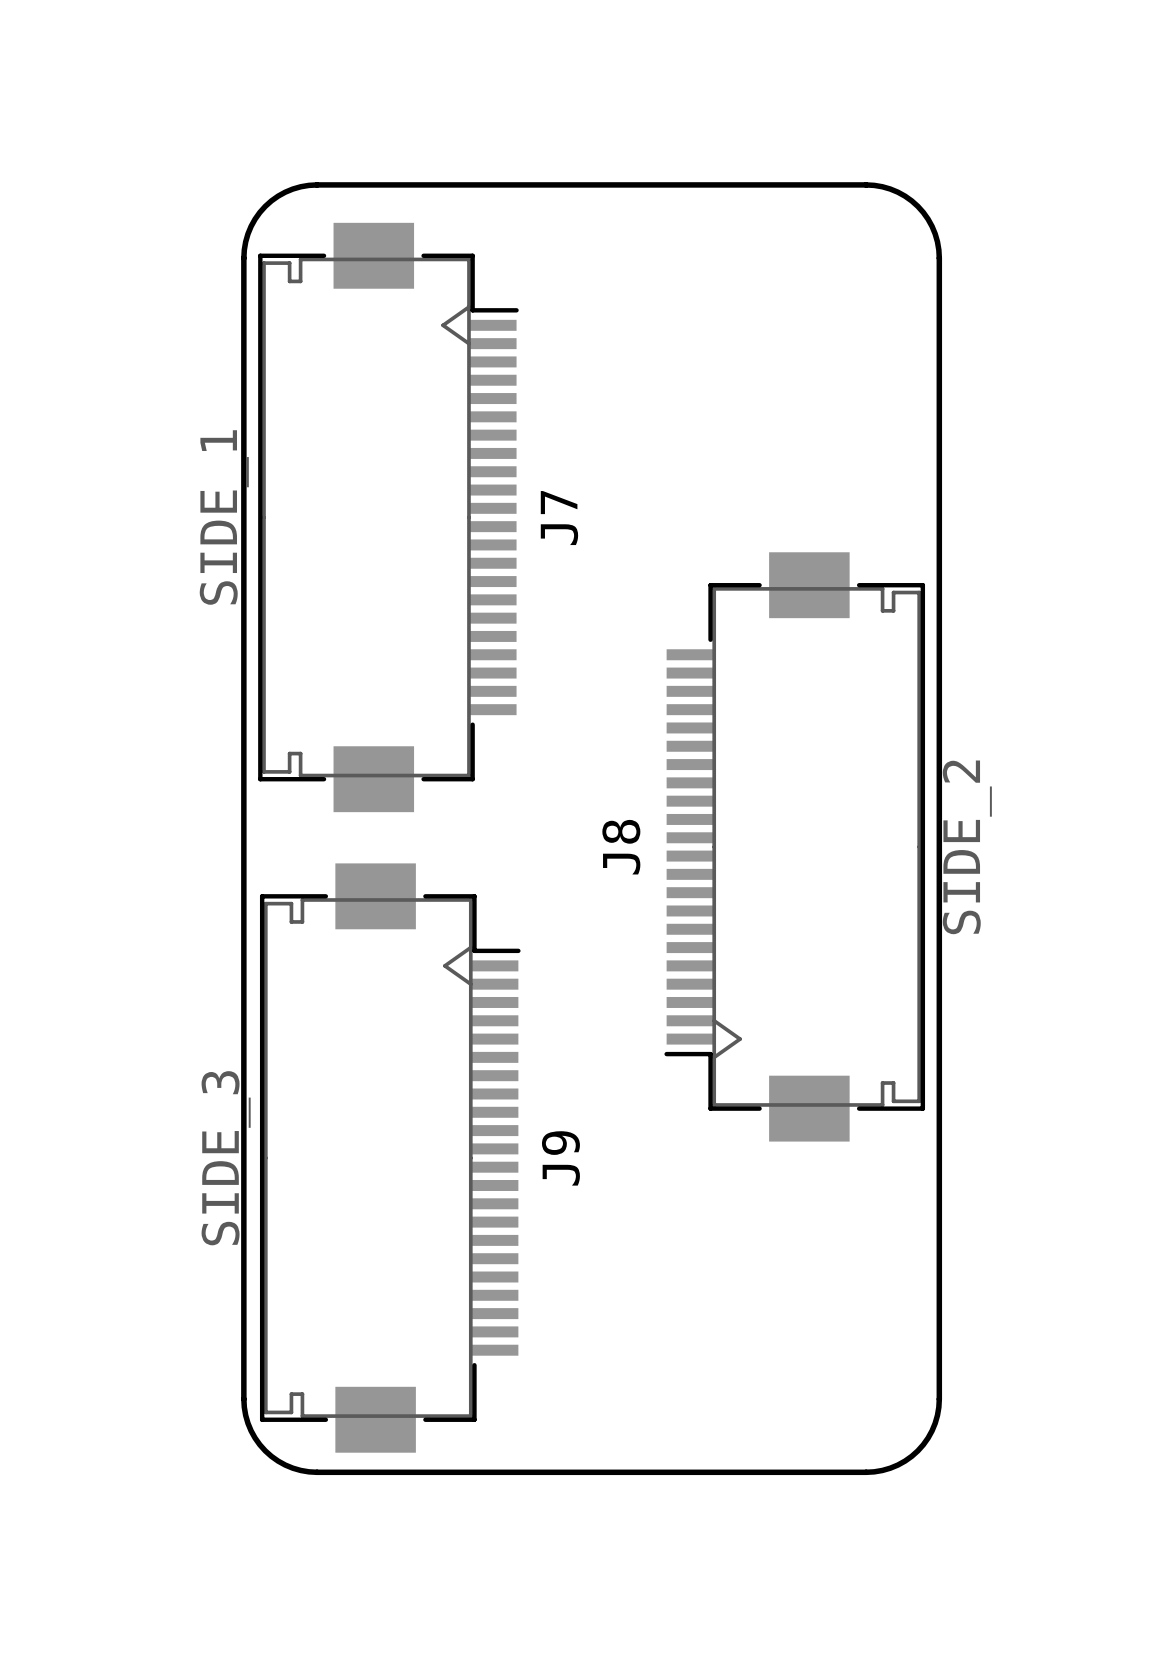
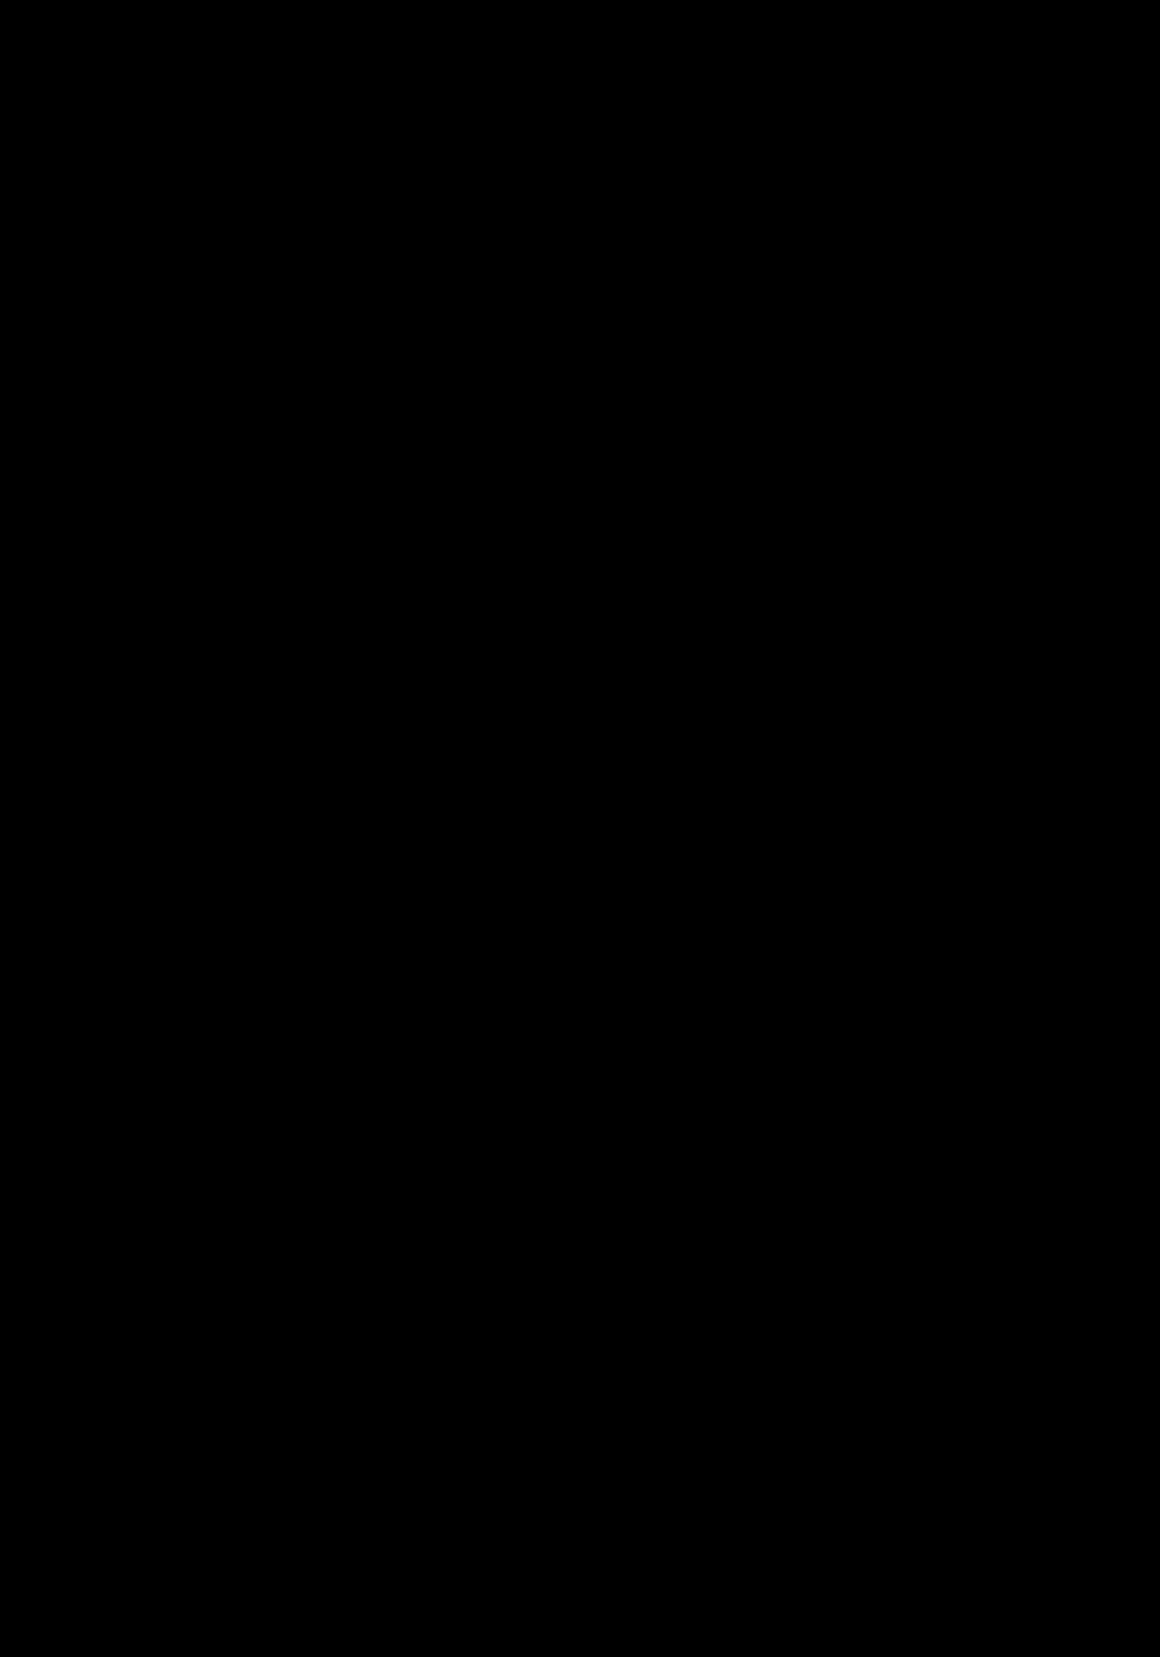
board edge: (317, 184) (874, 185) (890, 189) (905, 196) (923, 212) (932, 226) (937, 241) (939, 258) (939, 1399) (937, 1415) (928, 1438) (917, 1450) (897, 1465) (882, 1470) (866, 1472) (317, 1472) (292, 1468) (278, 1461) (259, 1444) (251, 1430) (245, 1415) (243, 1399) (243, 258) (247, 233) (255, 219) (265, 206) (278, 196) (292, 189) (317, 184) -> none
J7: SIDE_1 (388, 517) -> none
J8: SIDE_2 (794, 846) -> none
J9: SIDE_3 (390, 1158) -> none

